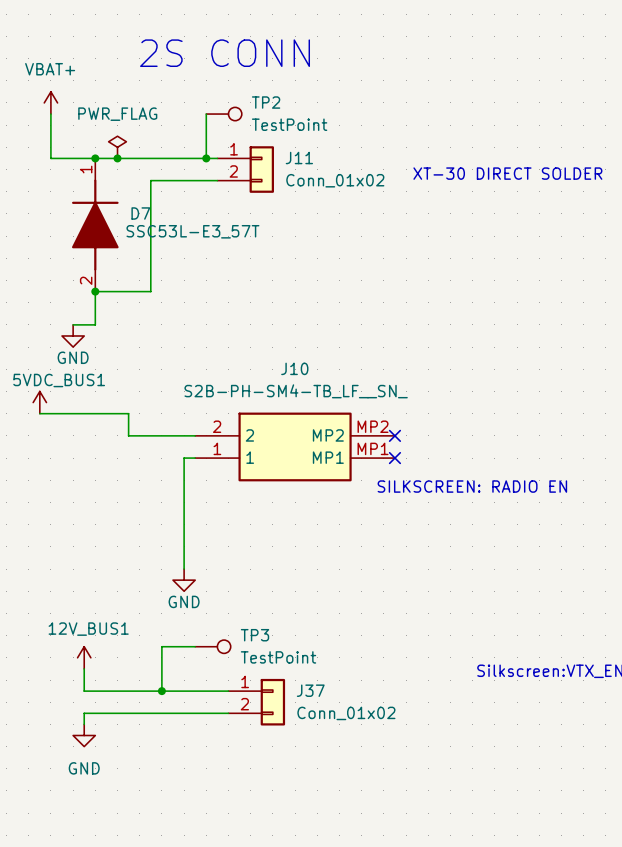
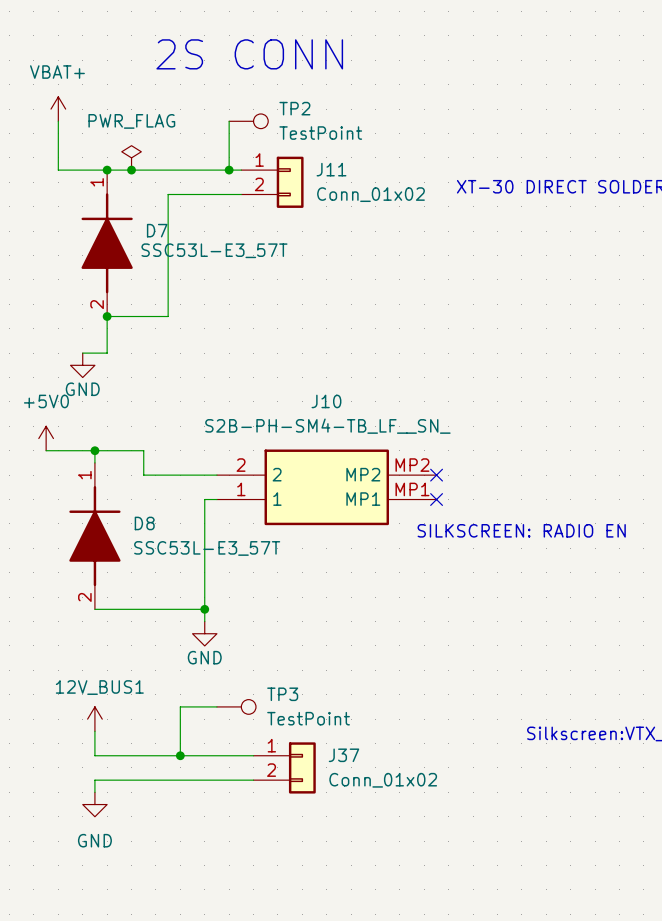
power symbol: 5VDC_BUS1 (39, 402) -> +5V0 (46, 438)
wire: none -> (94, 450) (94, 462)
junction: none -> (94, 450)
D8: none -> SSC53L-E3_57T (94, 536)
wire: none -> (94, 609) (204, 609)
junction: none -> (204, 609)

